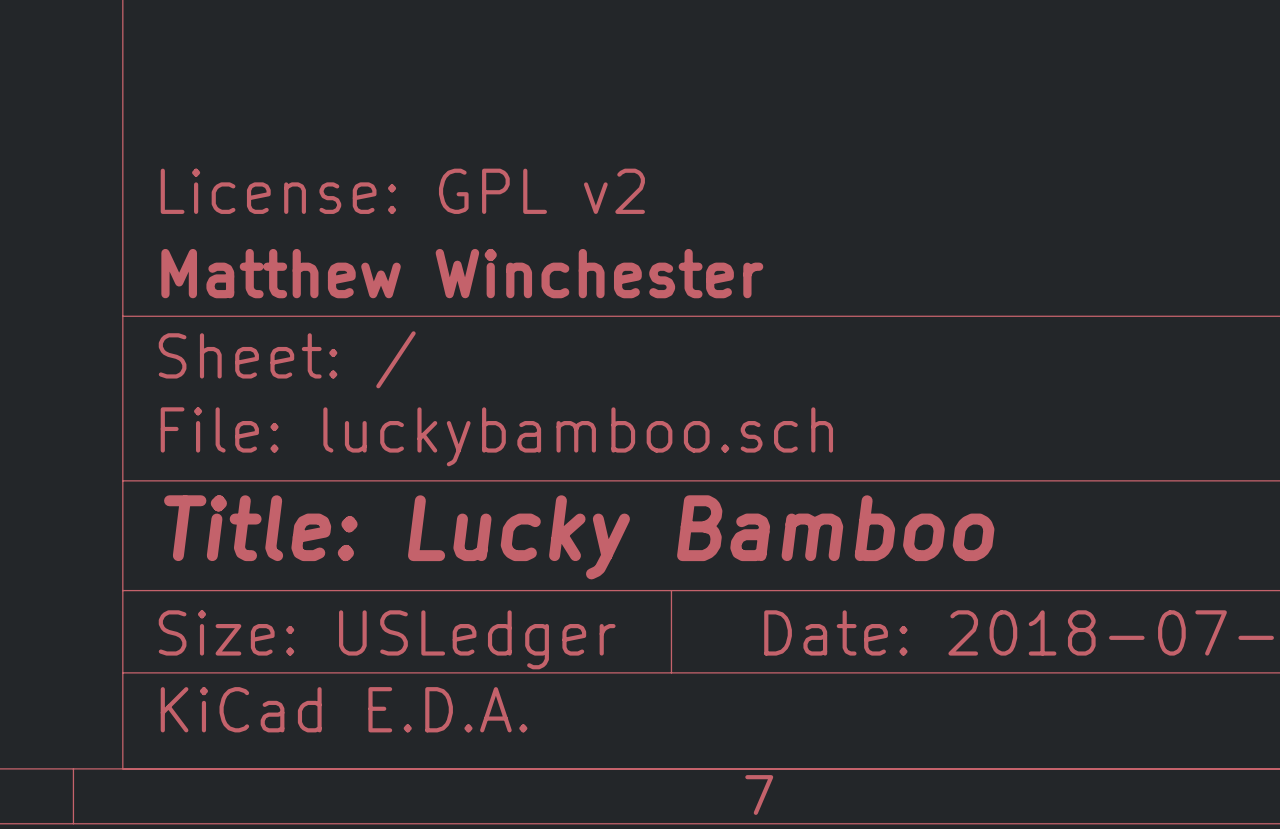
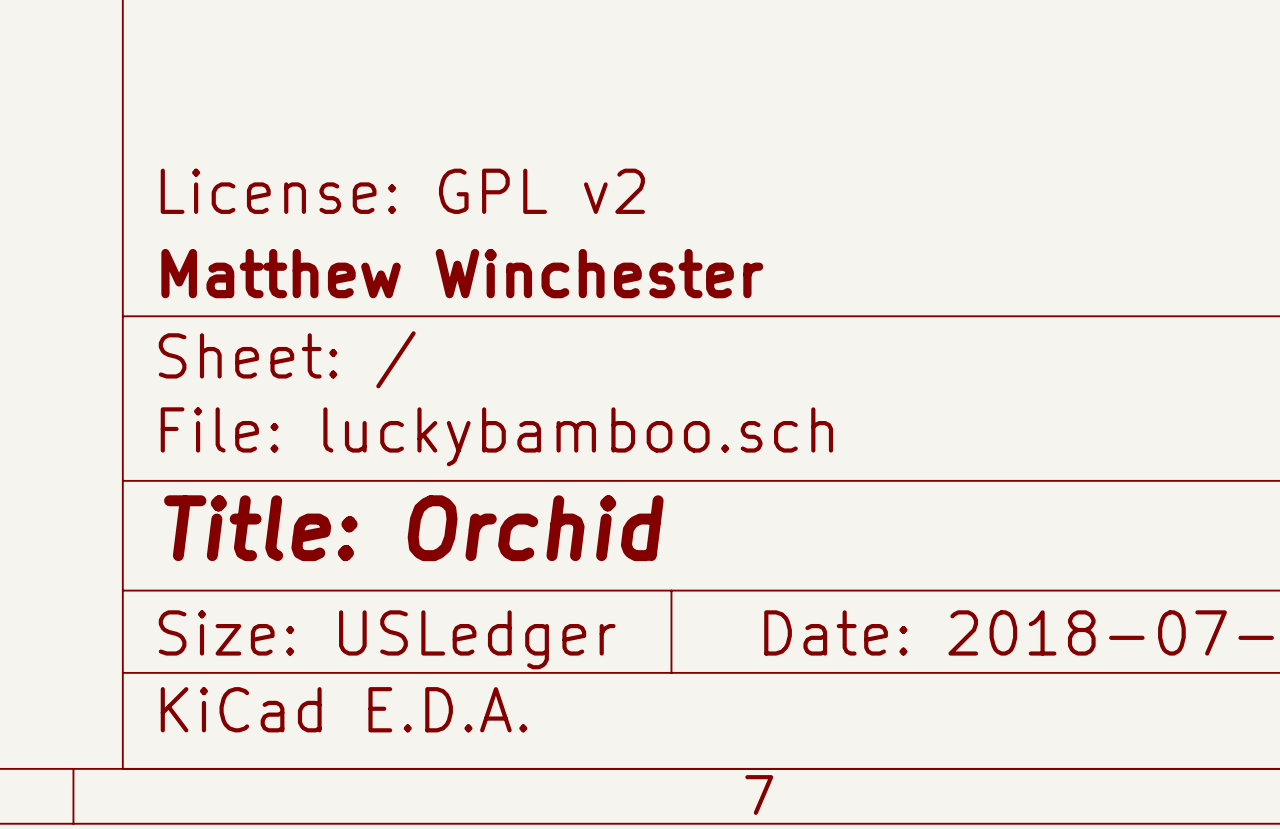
title block: Title: Lucky Bamboo (579, 537) -> Title: Orchid (413, 528)

